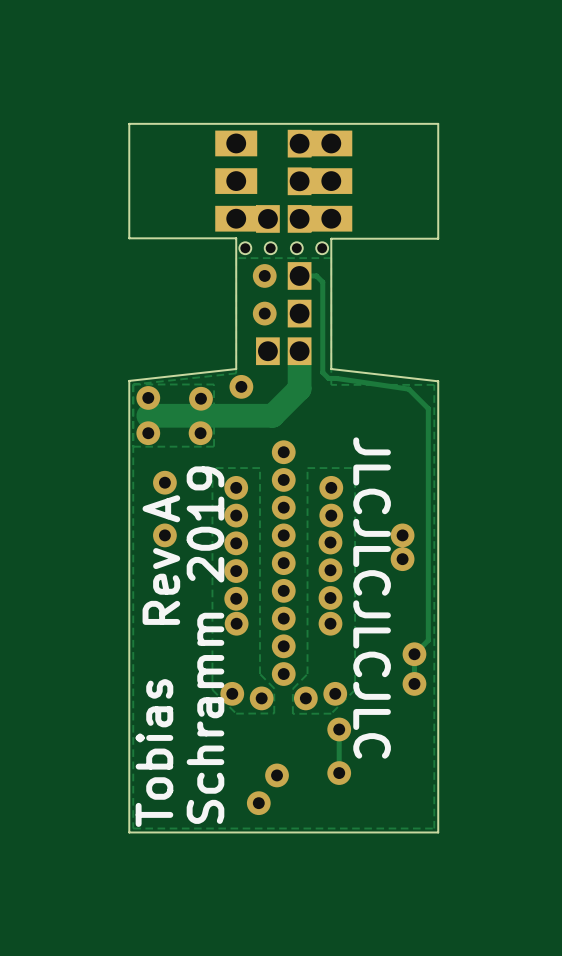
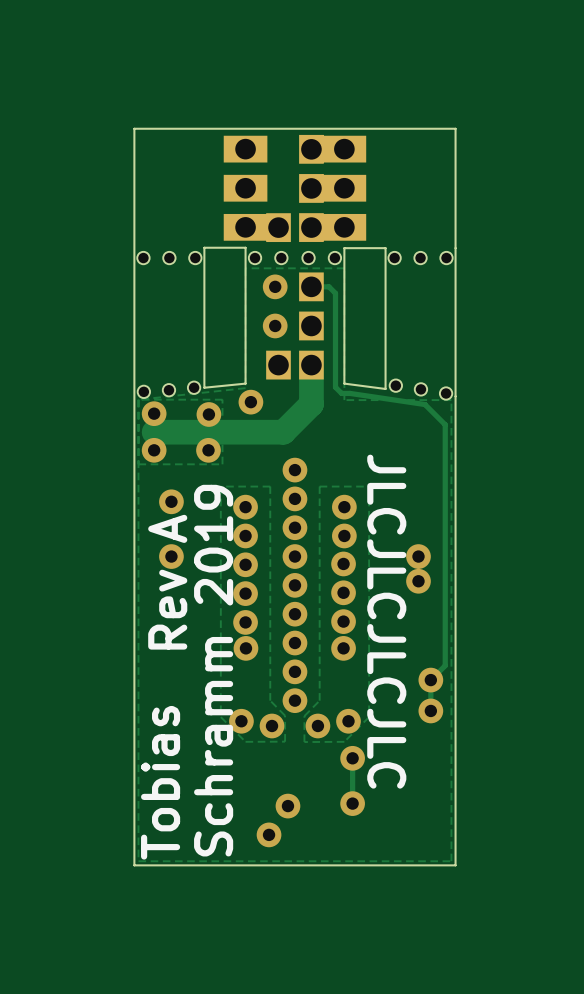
board edge: (196, 238) (129, 238) -> (134, 395) (134, 247)
board edge: (438, 238) (370, 238) -> (455, 248) (455, 396)
part: none -> (143, 258)
part: none -> (169, 258)
part: none -> (195, 258)
part: none -> (394, 258)
part: none -> (420, 258)
part: none -> (446, 258)
board edge: (236, 369) (129, 380) -> (245, 383) (204, 387) (204, 247)
board edge: (331, 369) (438, 381) -> (344, 383) (385, 388) (385, 248)
part: none -> (395, 385)
part: none -> (194, 387)
part: none -> (420, 389)
part: none -> (168, 390)
part: none -> (143, 391)
part: none -> (446, 393)

